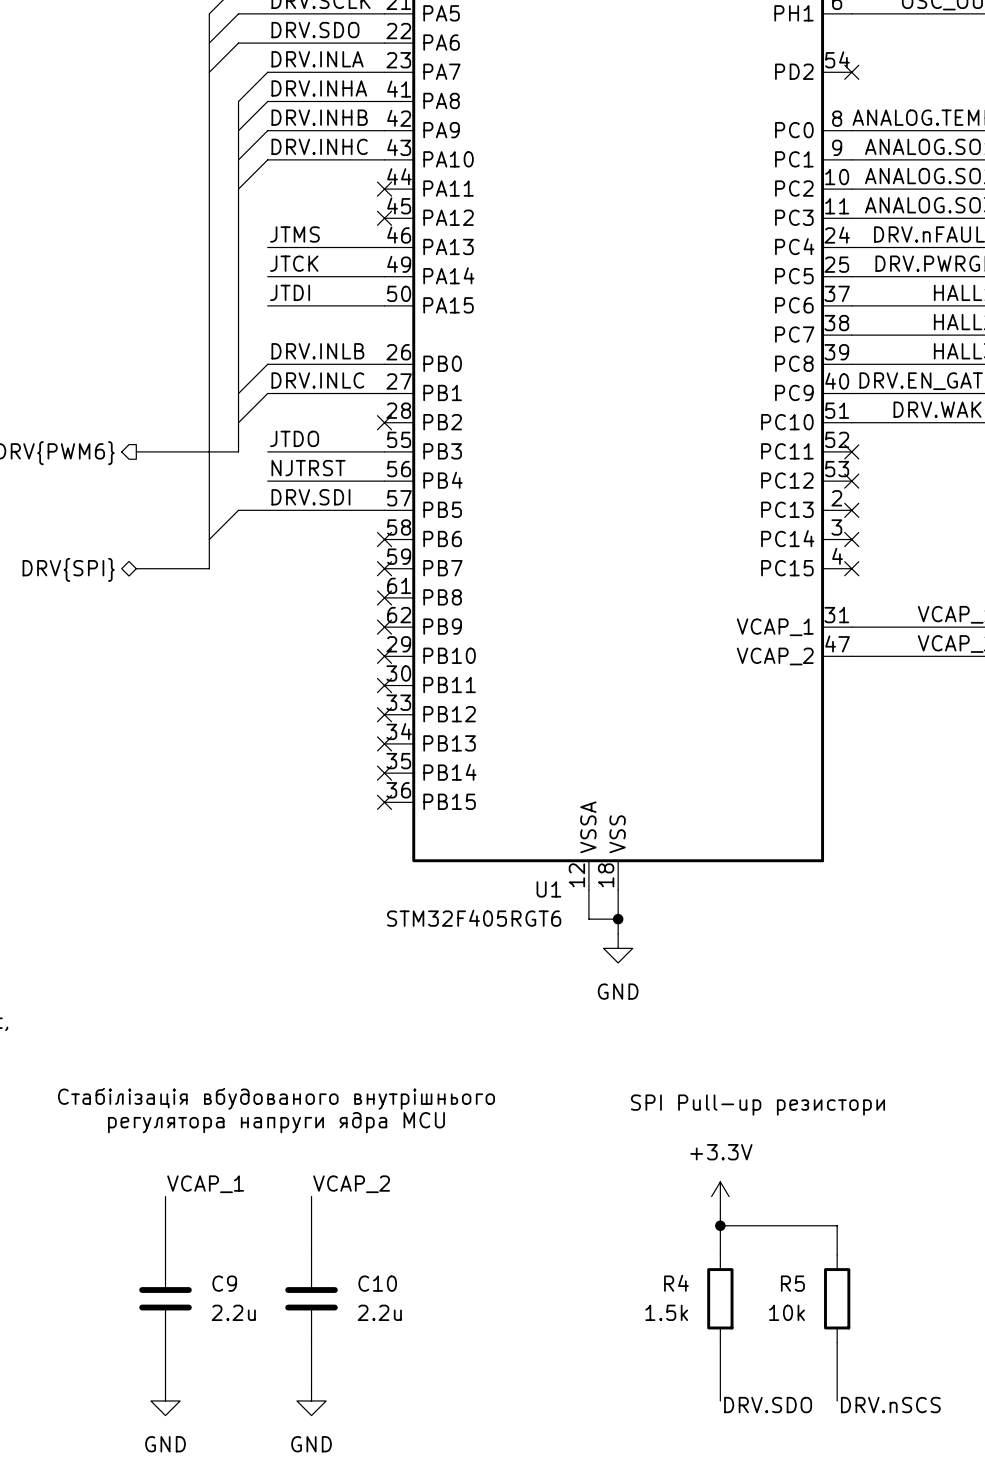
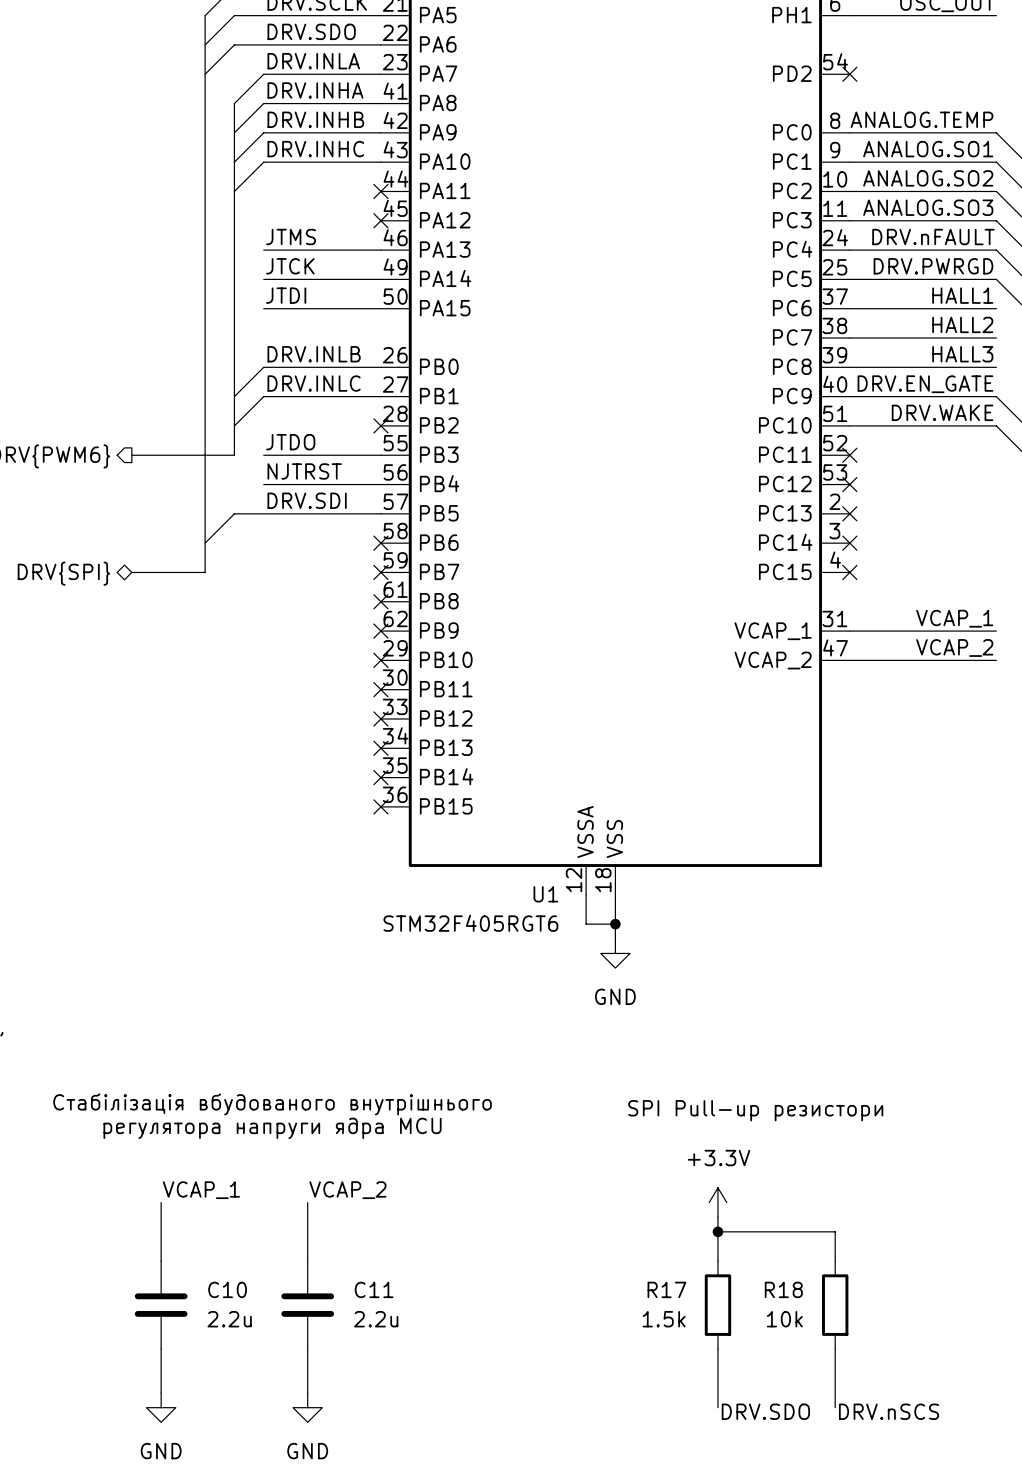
C9 name: C9 (224, 1283) -> C10 (227, 1289)
C10 name: C10 (377, 1283) -> C11 (374, 1289)
R4 name: R4 (676, 1283) -> R17 (666, 1289)
R5 name: R5 (792, 1283) -> R18 (783, 1289)

